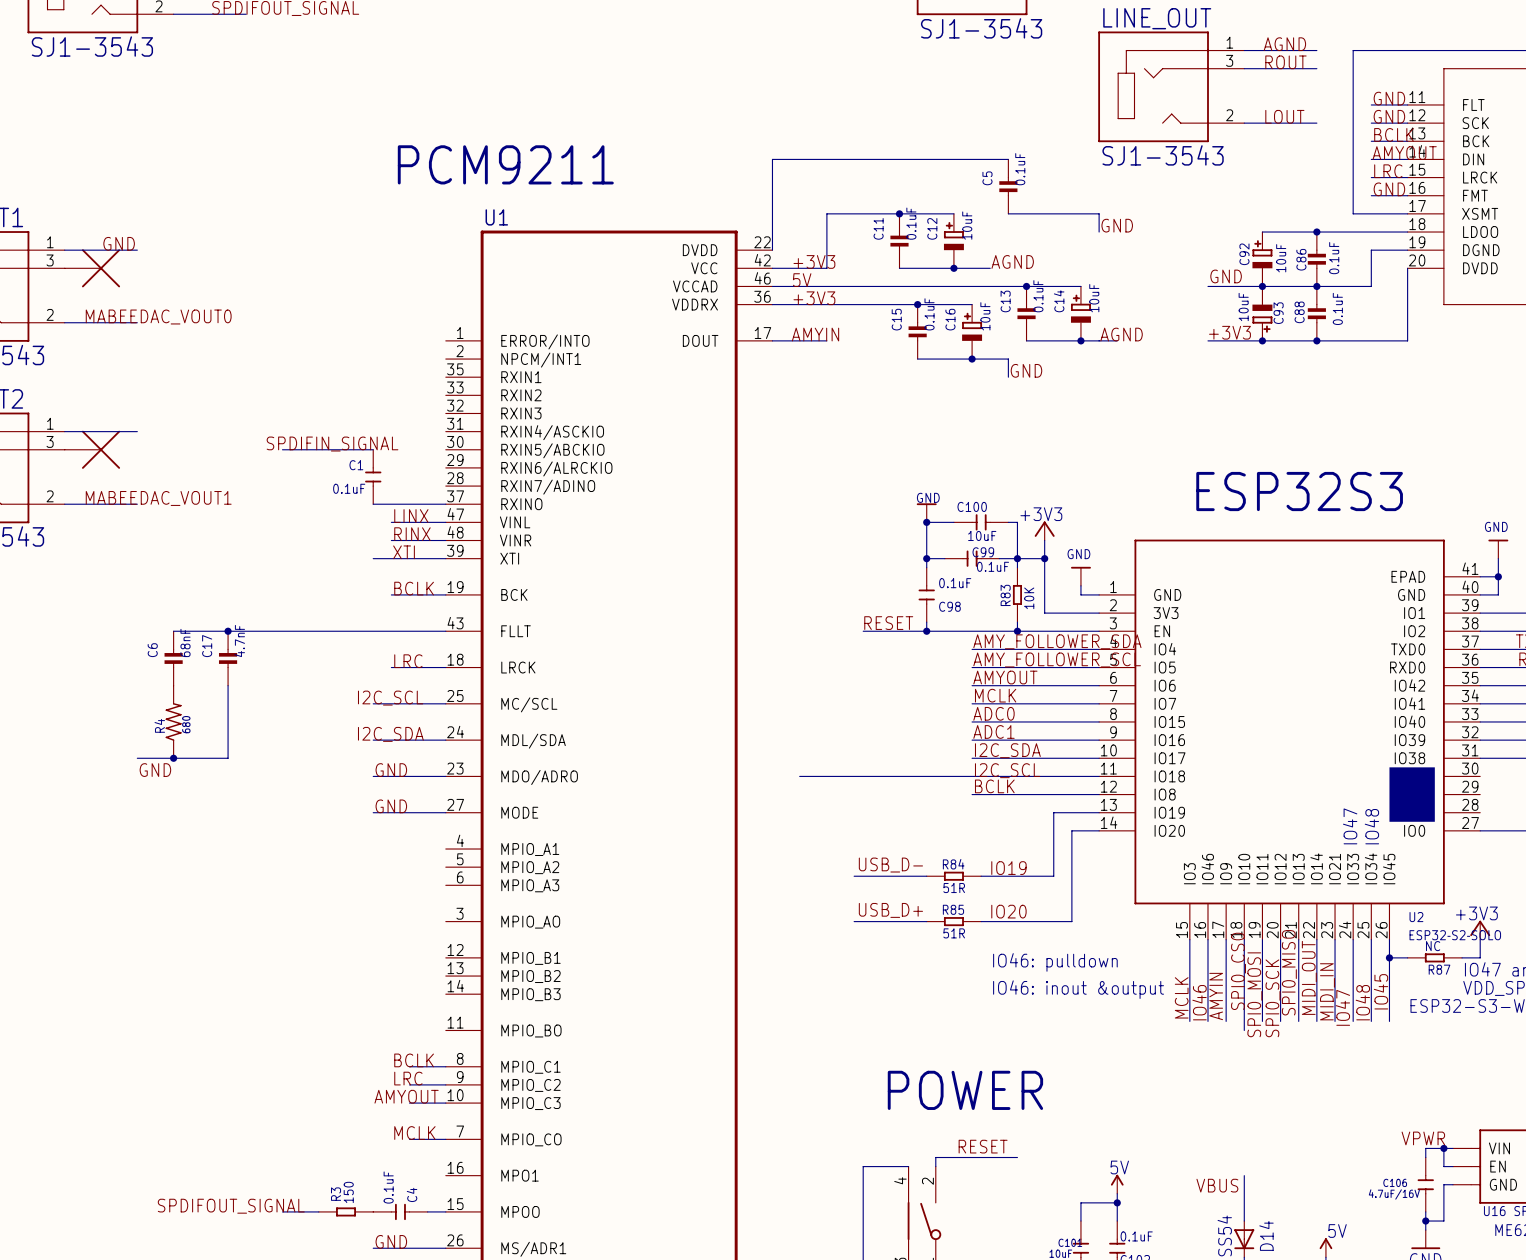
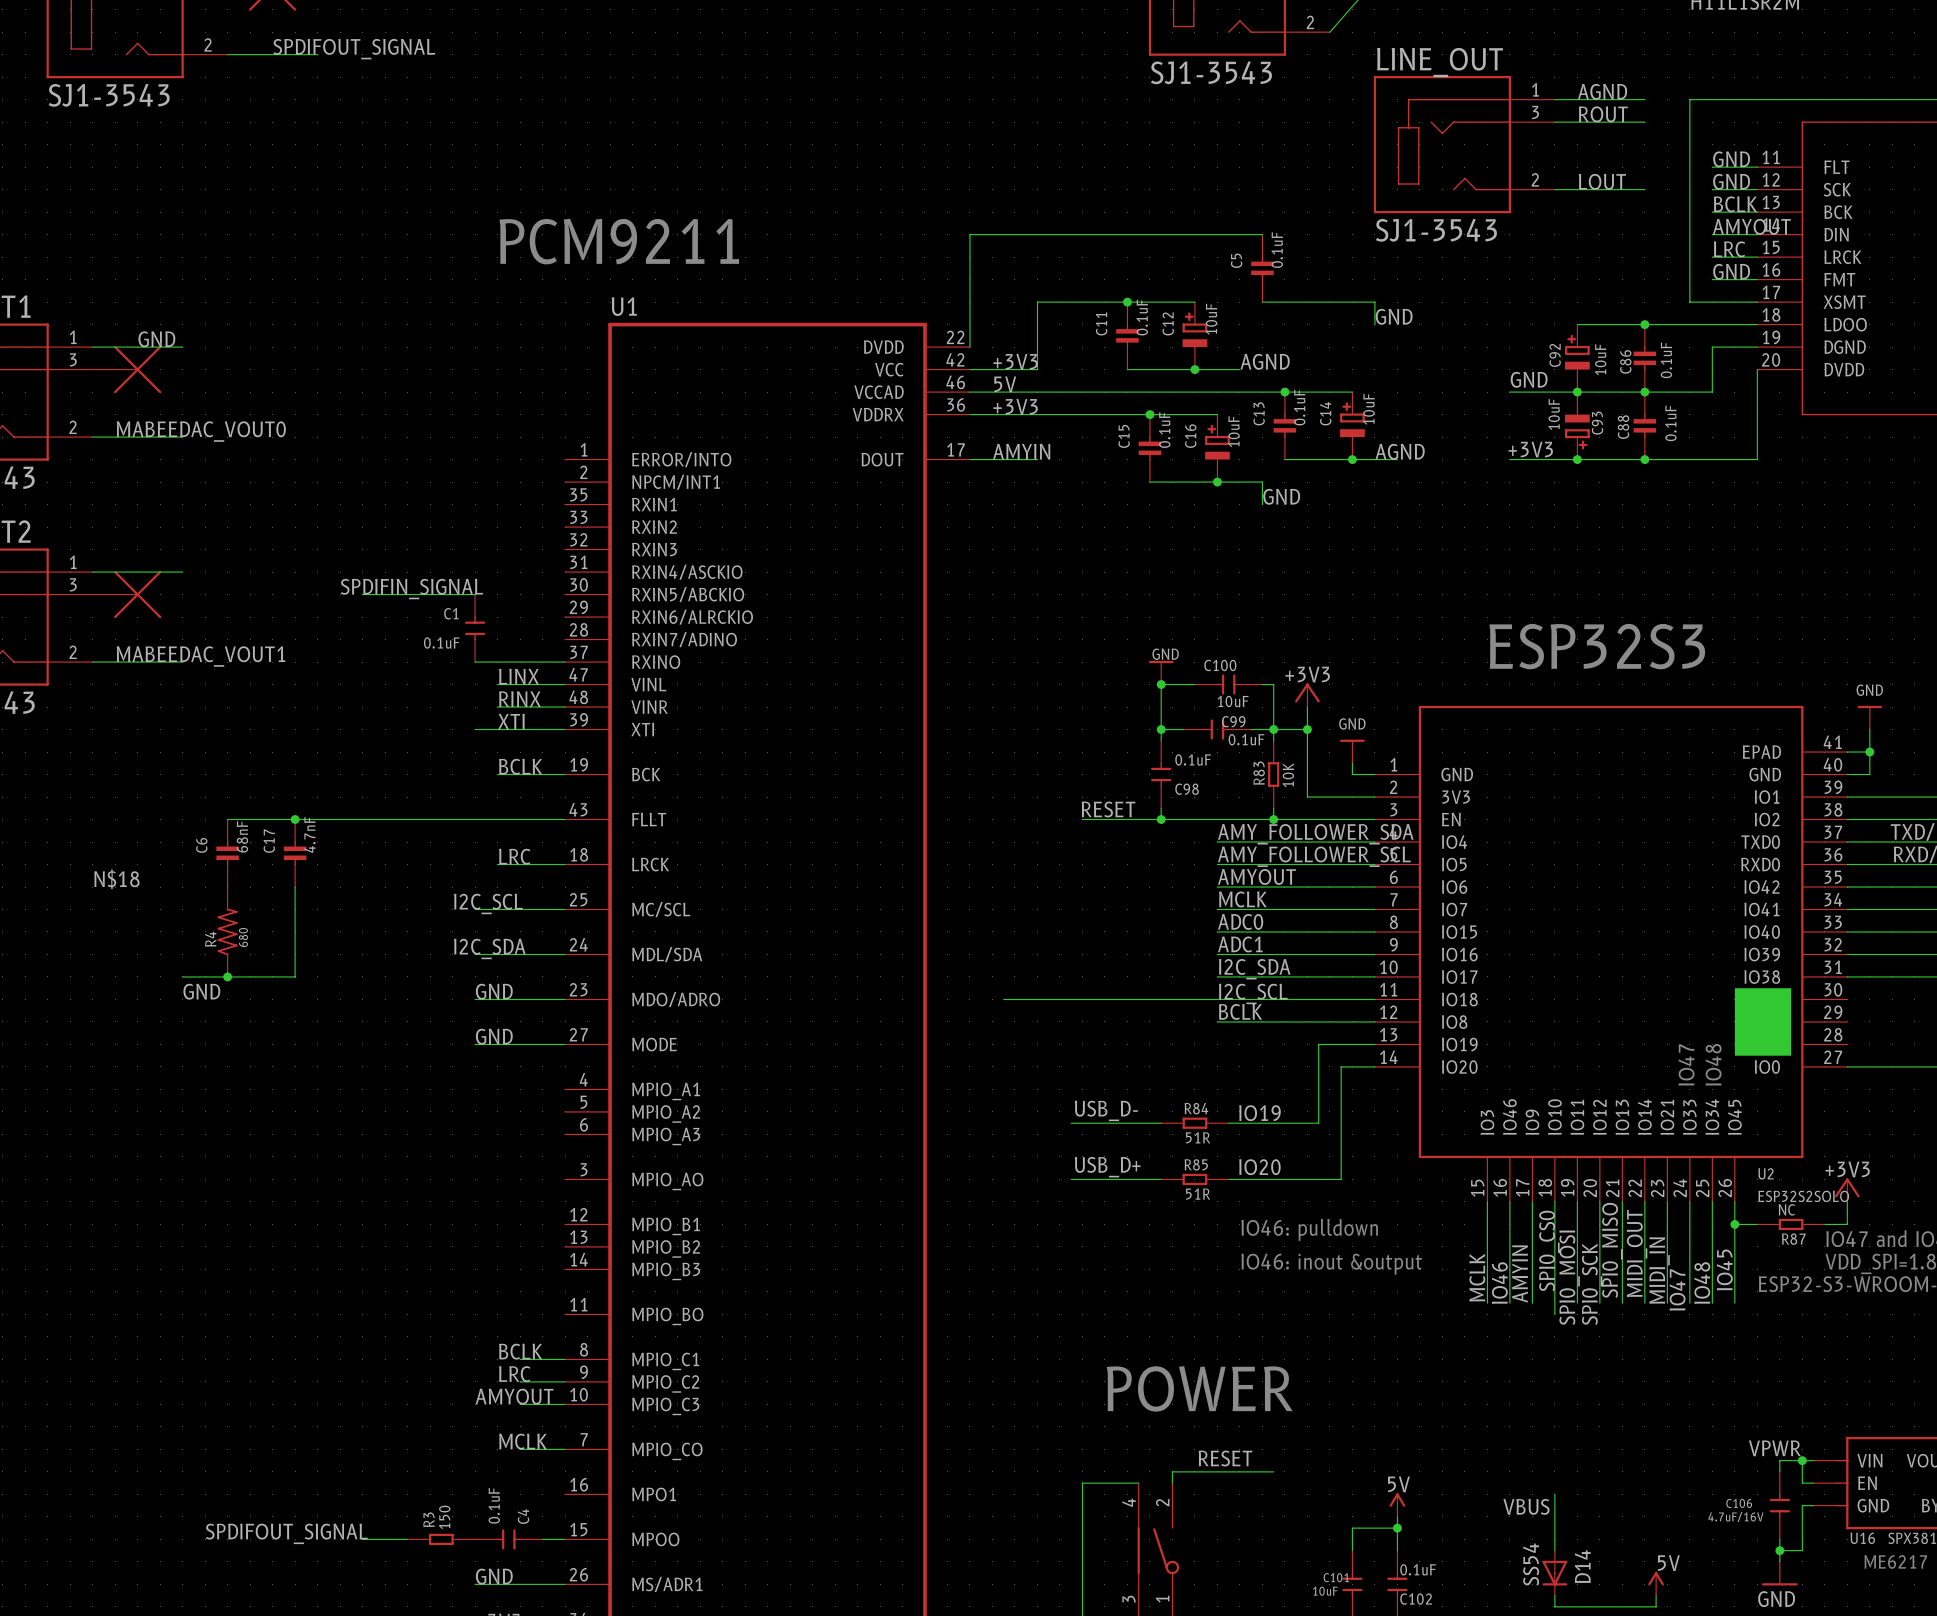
label: none -> N$18 (116, 879)

